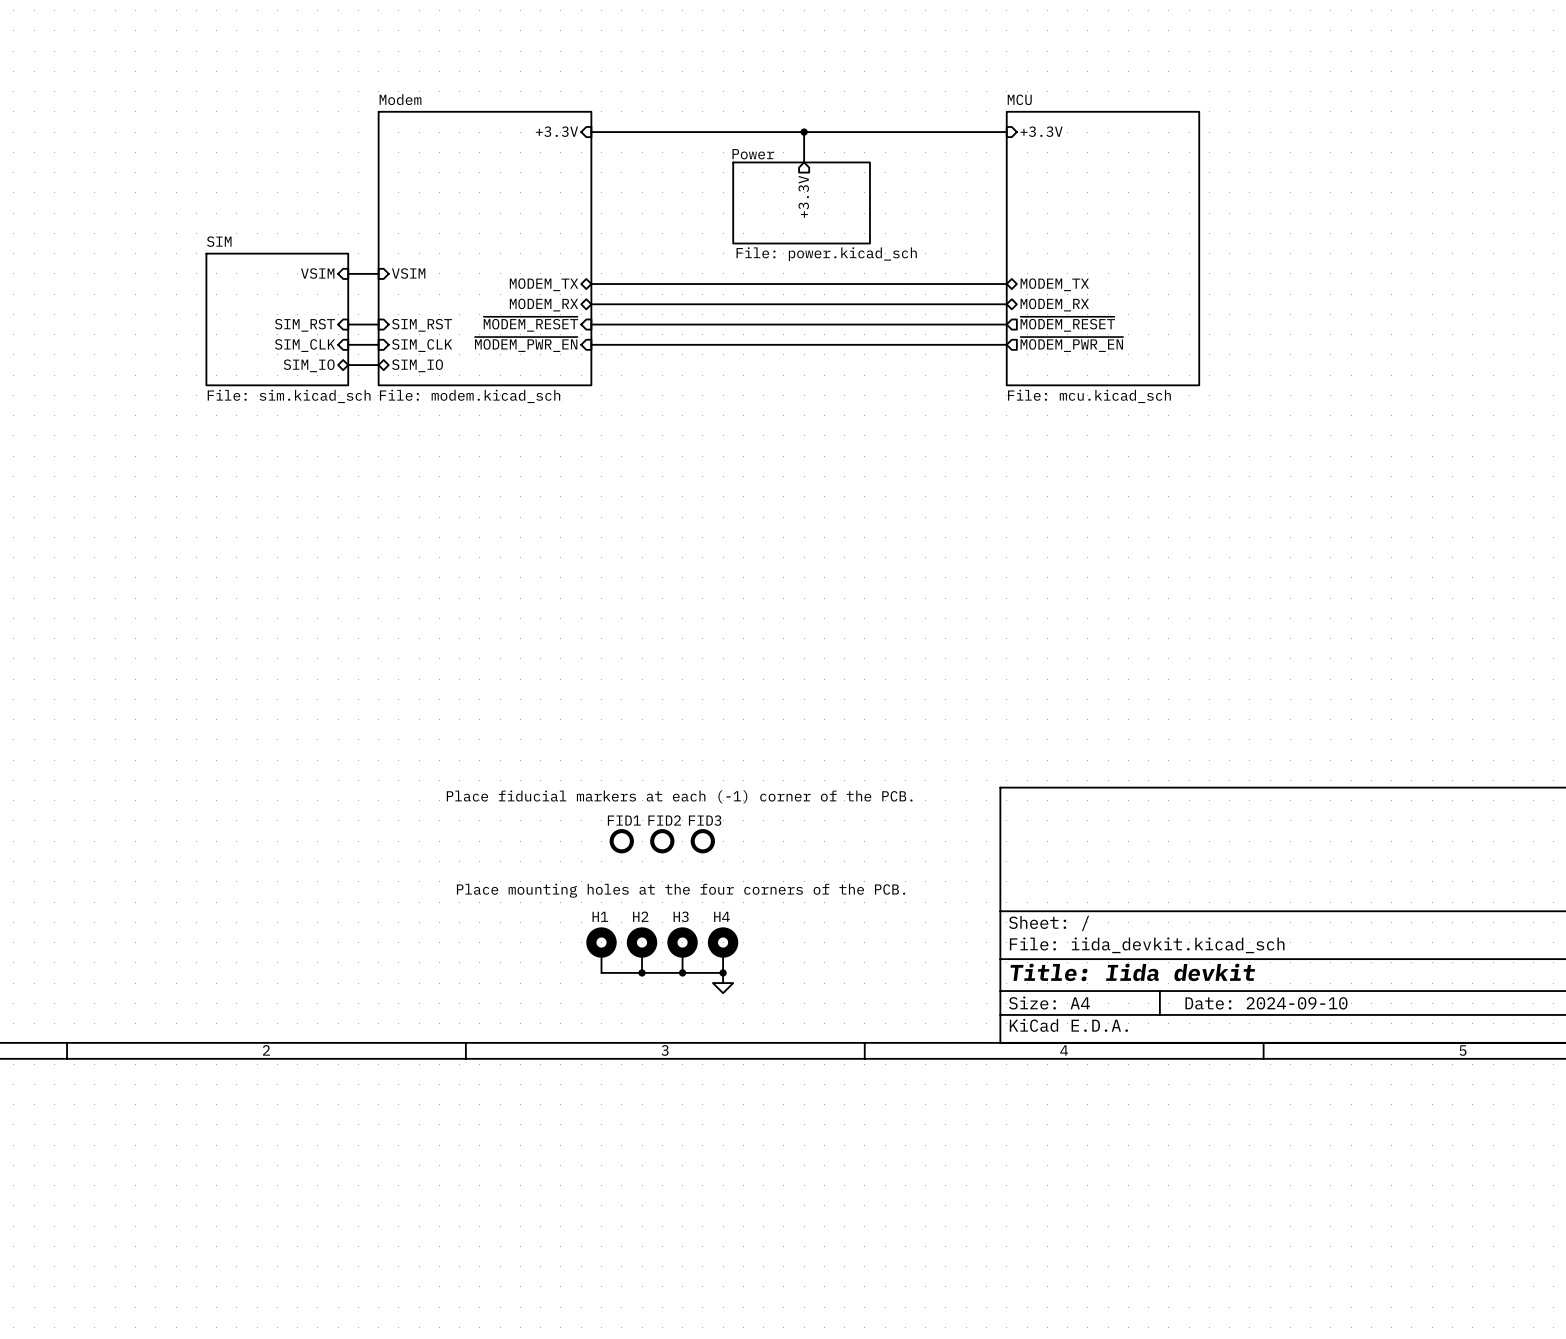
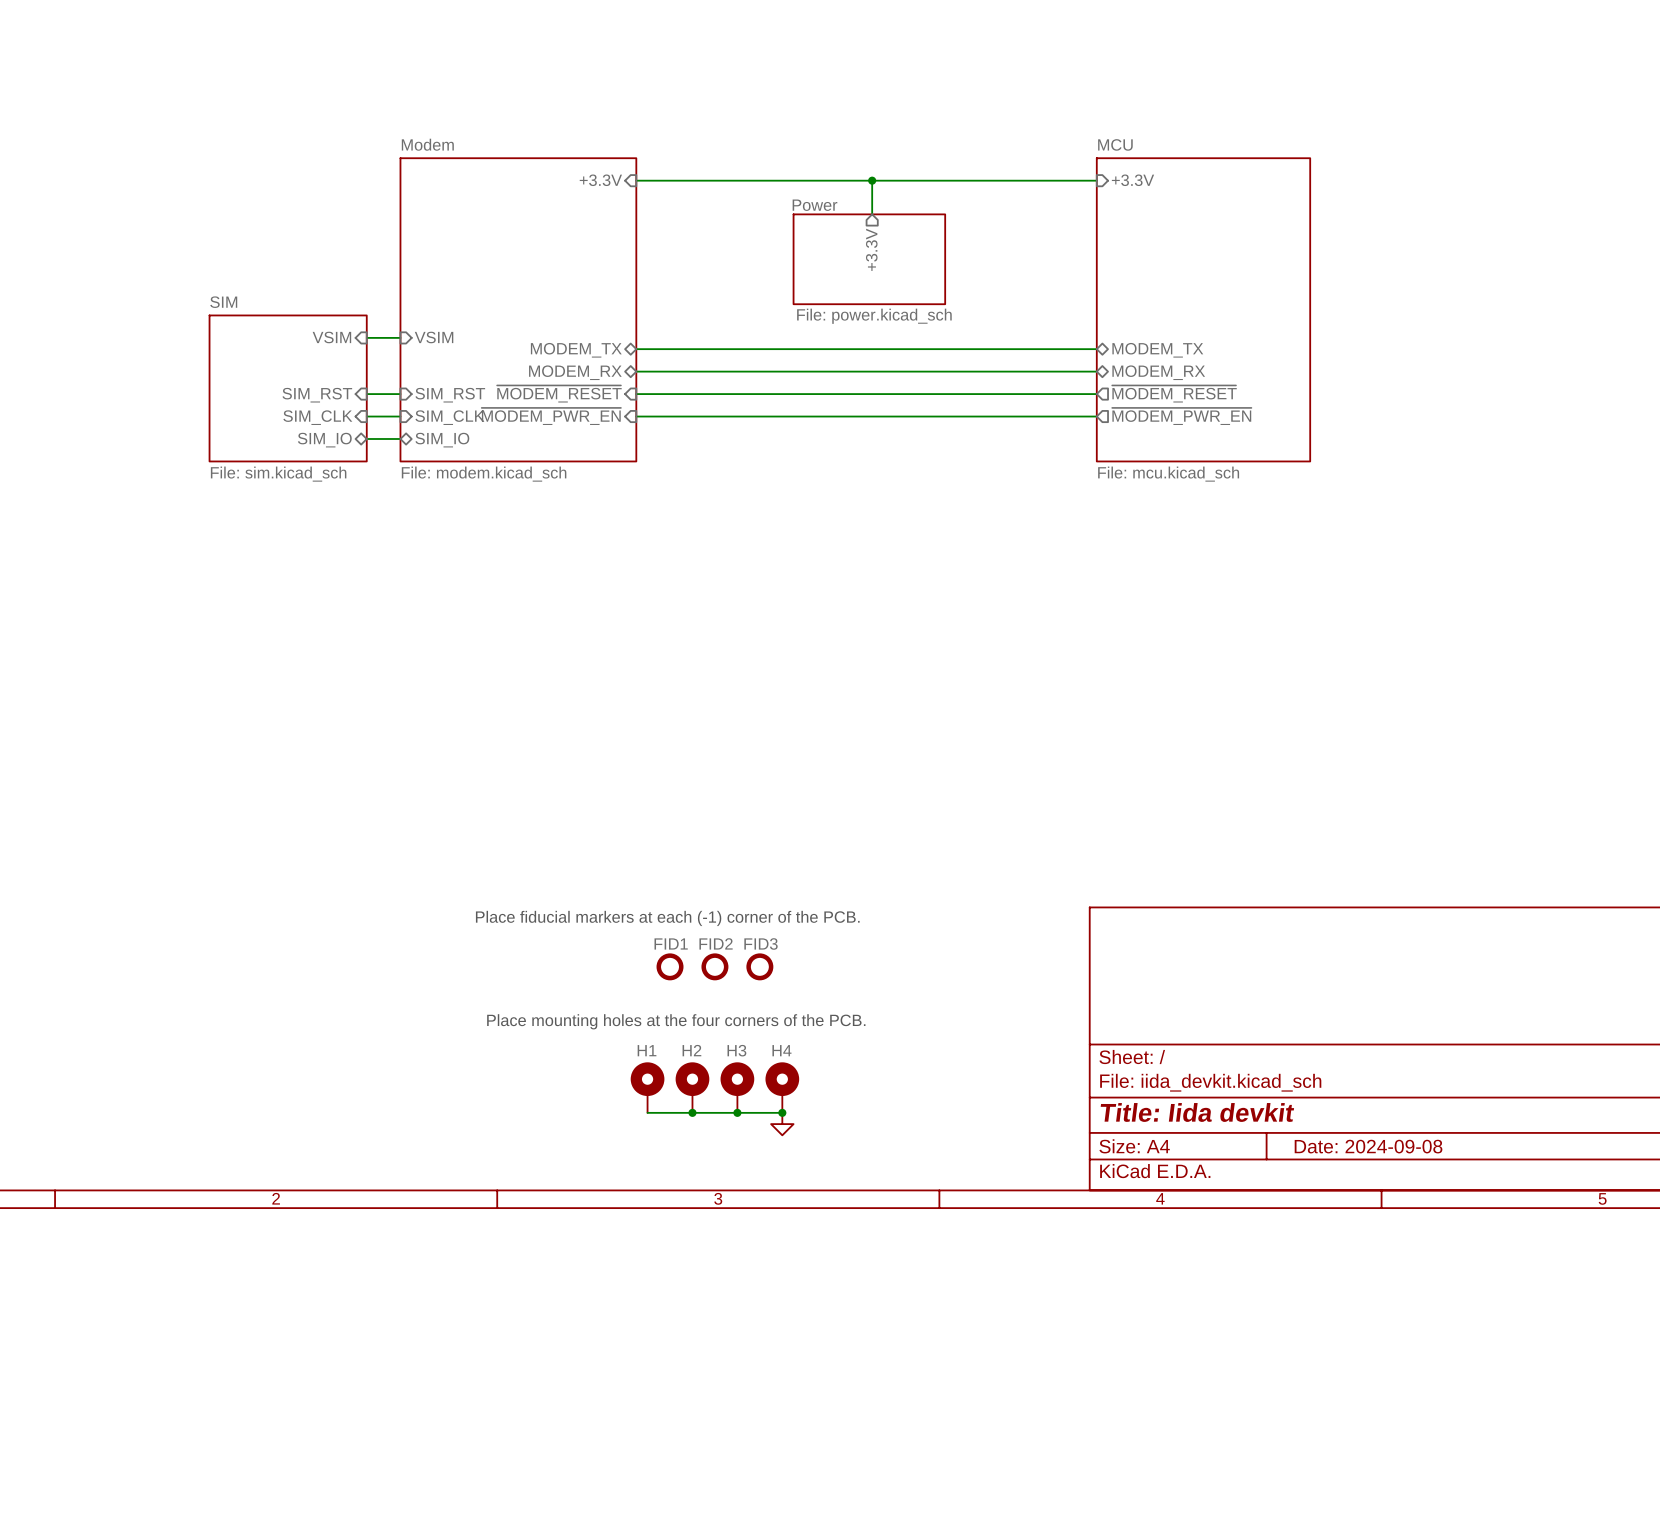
title block: Date: 2024-09-10 (1266, 1003) -> Date: 2024-09-08 (1368, 1146)

